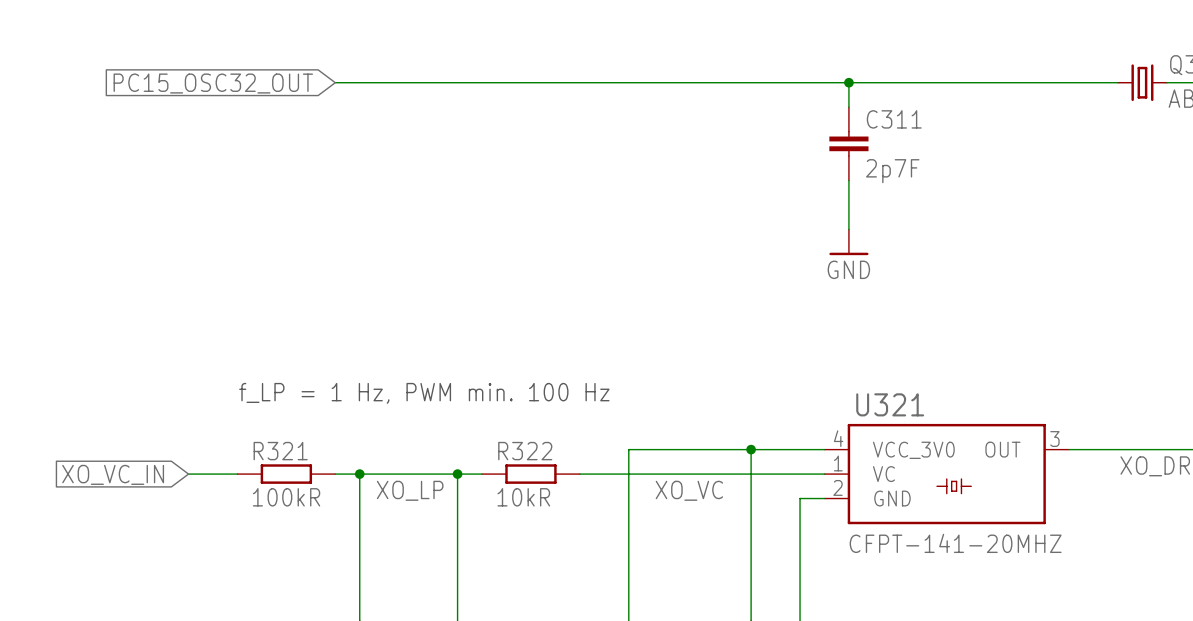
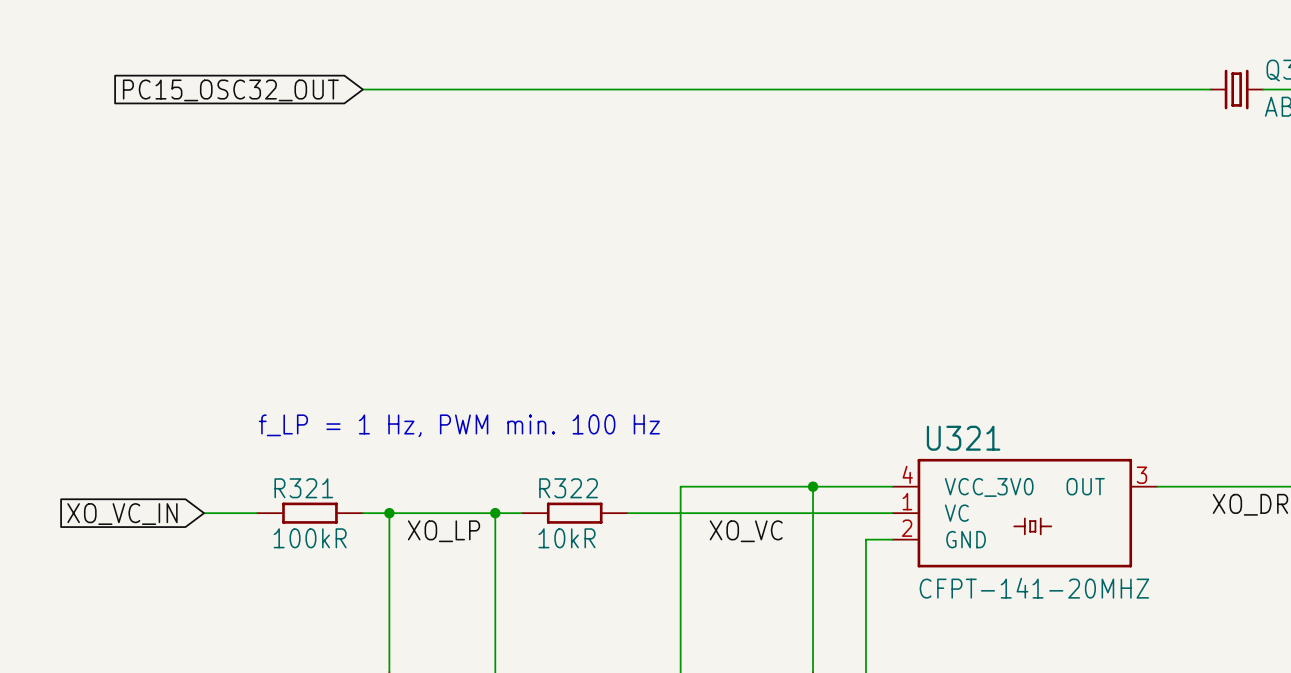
wire: (848, 82) (848, 107) -> none
junction: (848, 82) -> none
C311: 2p7F (848, 143) -> none
wire: (848, 180) (848, 229) -> none
power symbol: GND (848, 242) -> none

